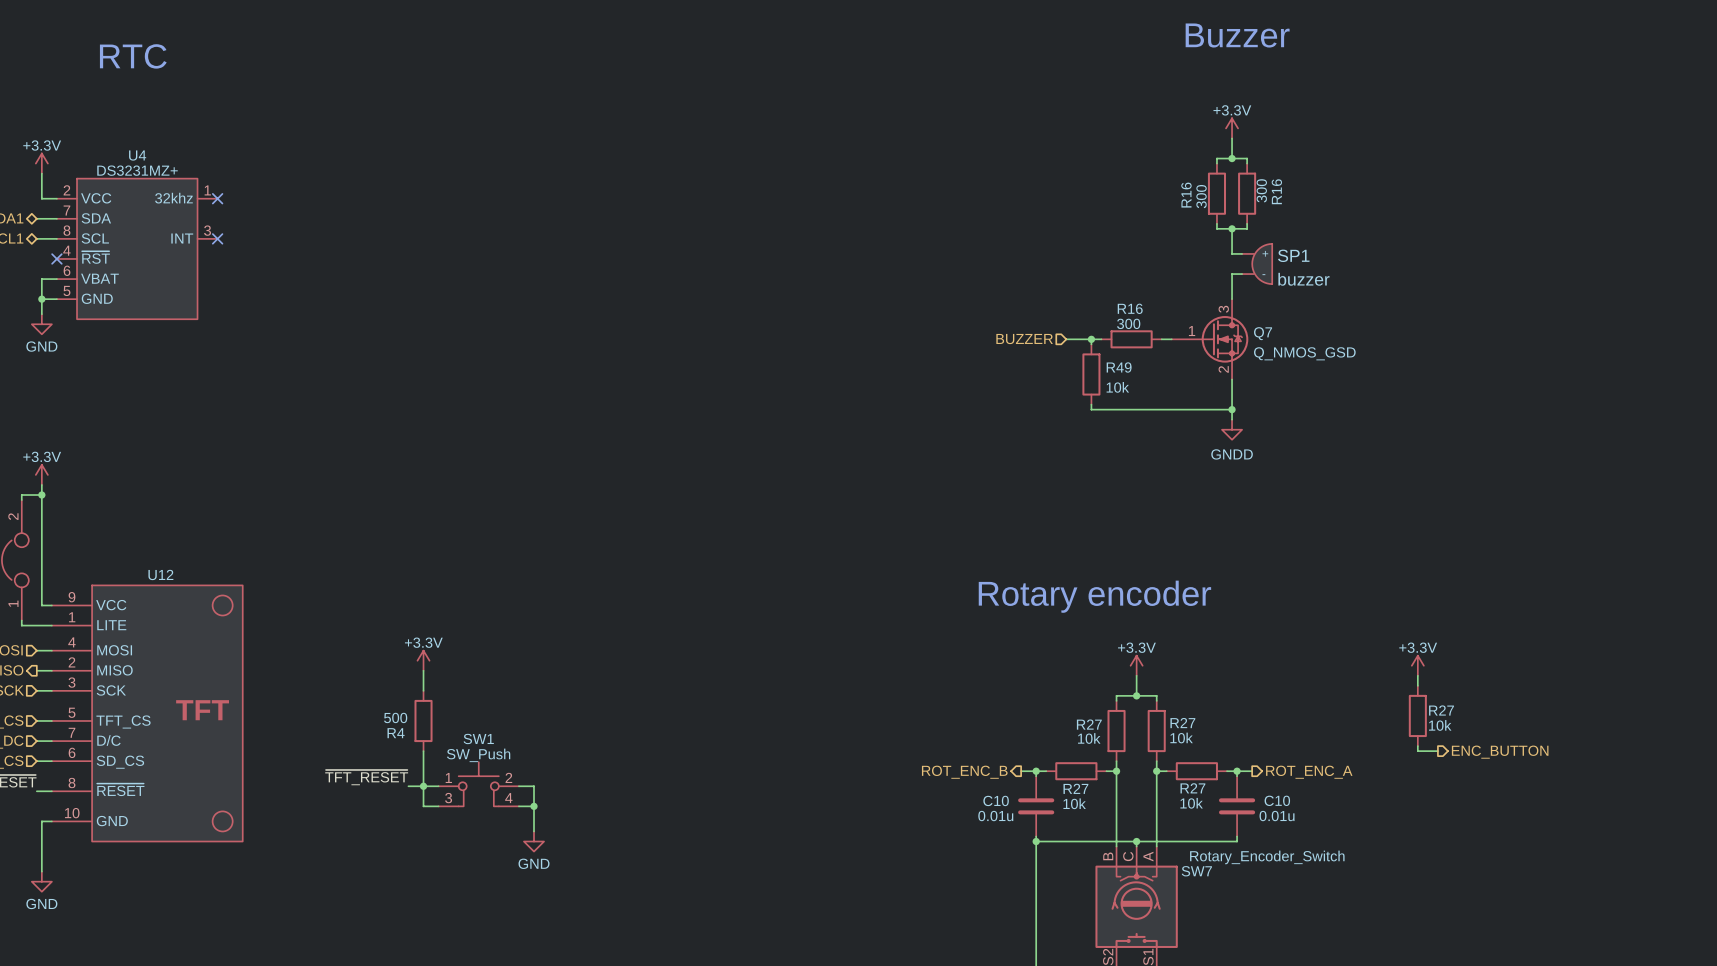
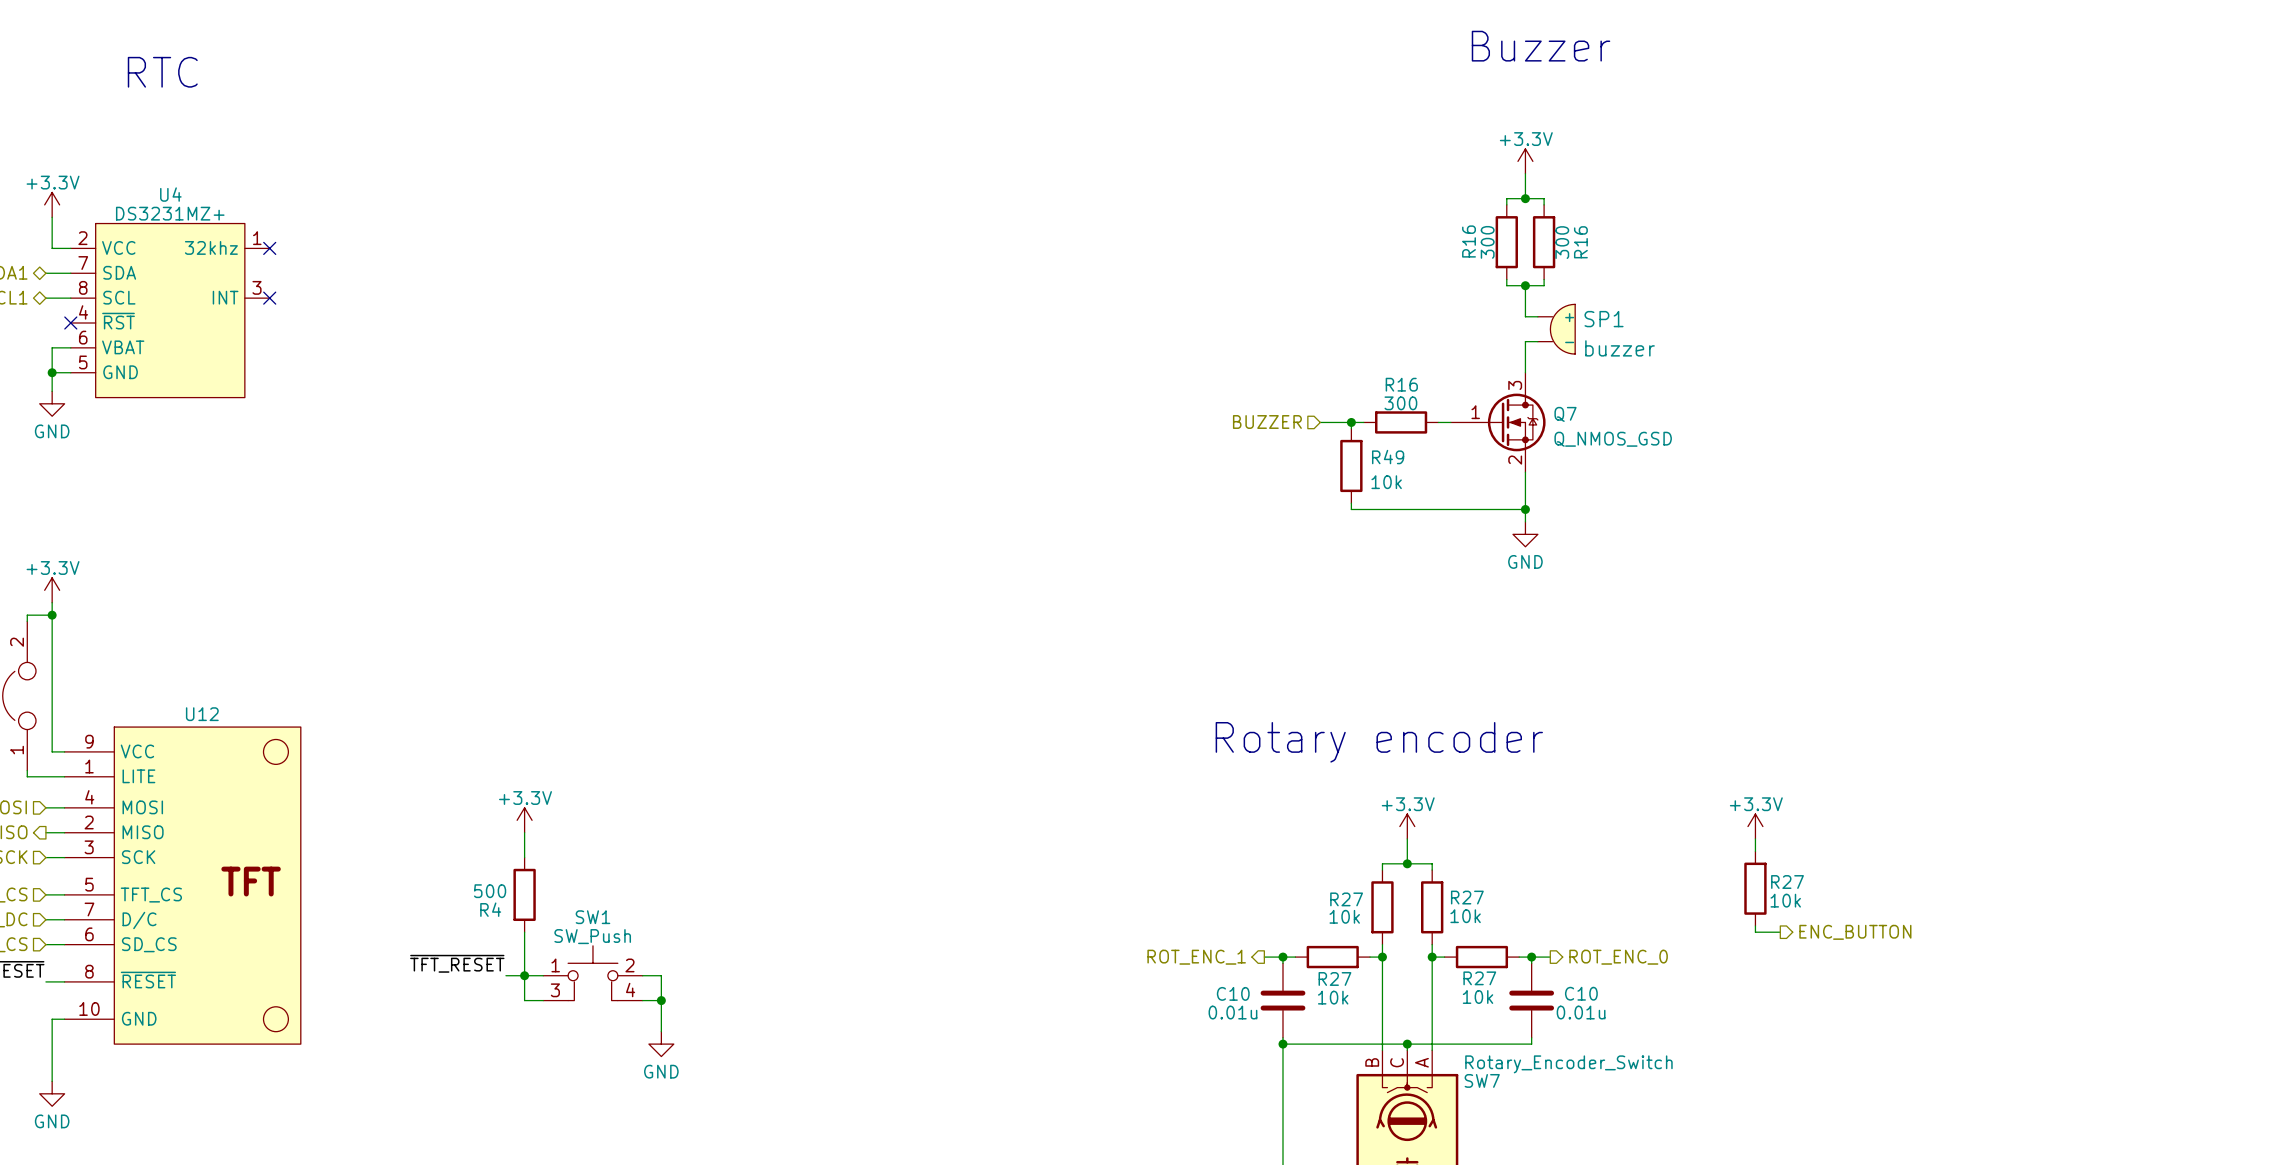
power symbol: GNDD (1232, 429) -> GND (1525, 534)
hierarchical label: ROT_ENC_B (964, 772) -> ROT_ENC_1 (1196, 957)
hierarchical label: ROT_ENC_A (1309, 772) -> ROT_ENC_0 (1618, 957)

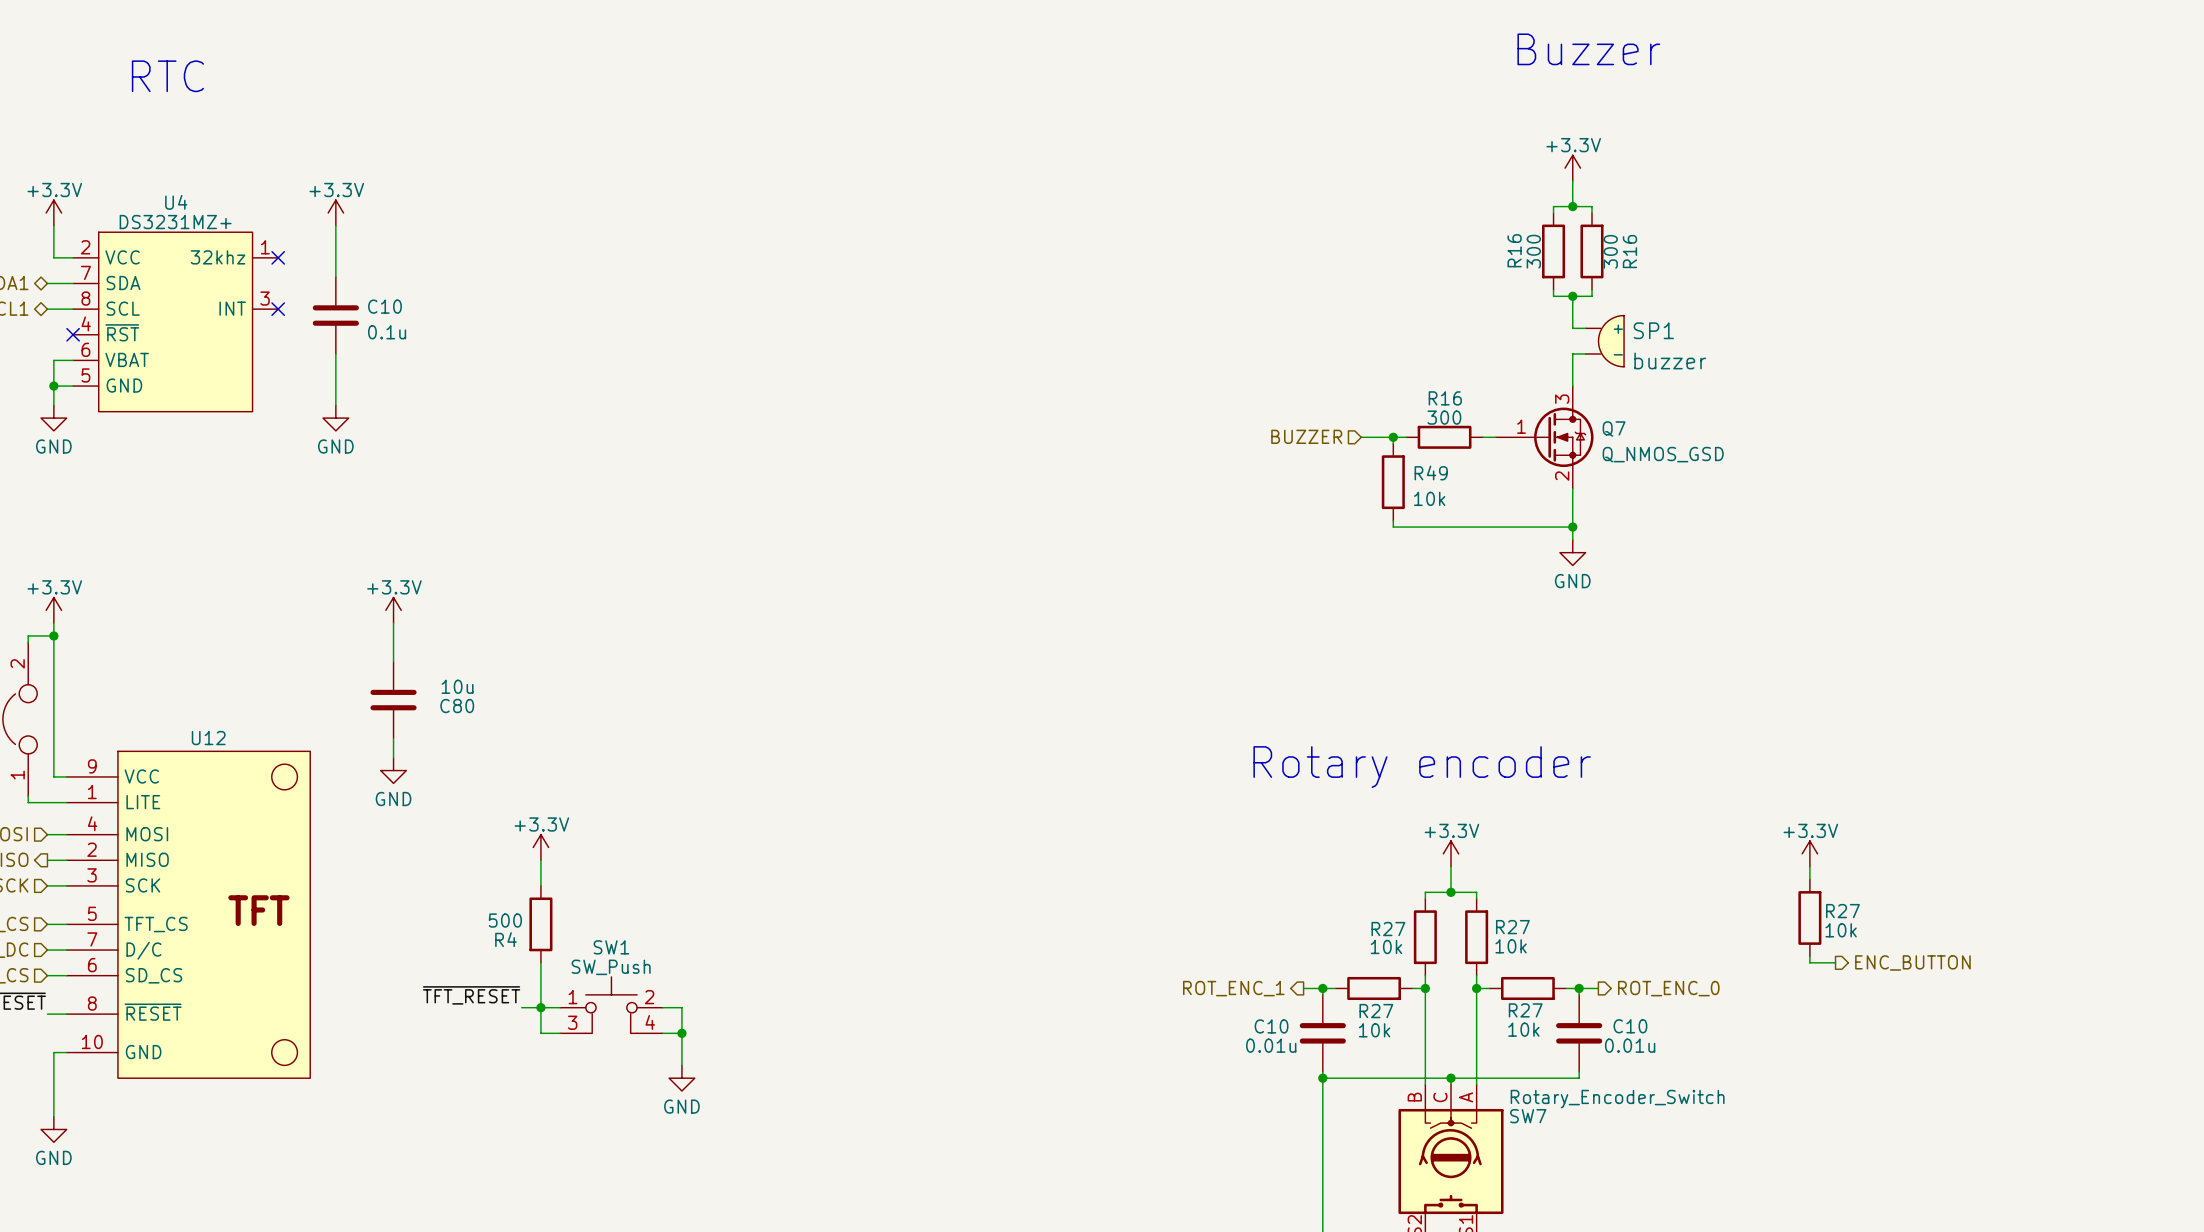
power symbol: none -> +3.3V (335, 213)
wire: none -> (335, 225) (335, 277)
C10: none -> 0.1u (335, 315)
wire: none -> (335, 353) (335, 405)
power symbol: none -> GND (335, 418)
power symbol: none -> +3.3V (393, 610)
wire: none -> (393, 623) (393, 661)
C80: none -> 10u (393, 700)
wire: none -> (393, 738) (393, 757)
power symbol: none -> GND (393, 770)

